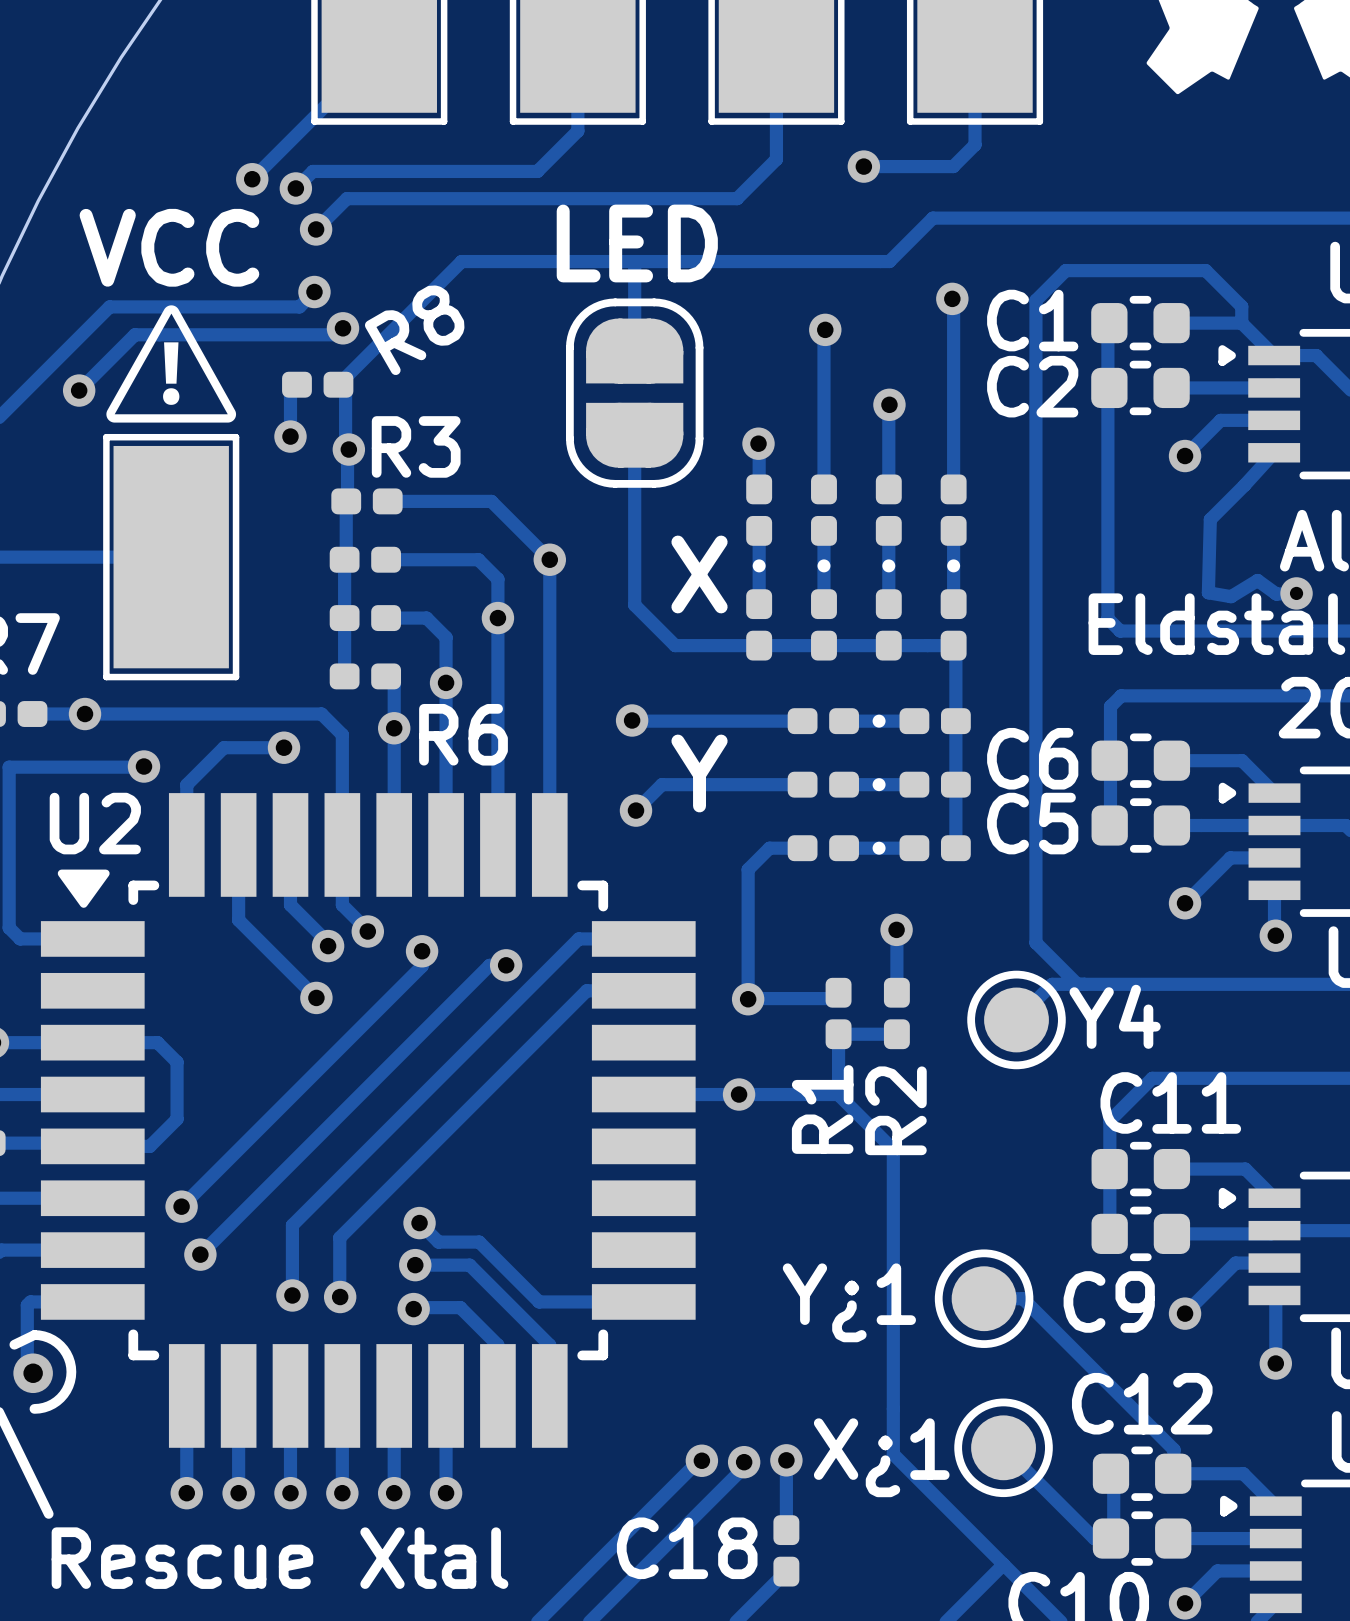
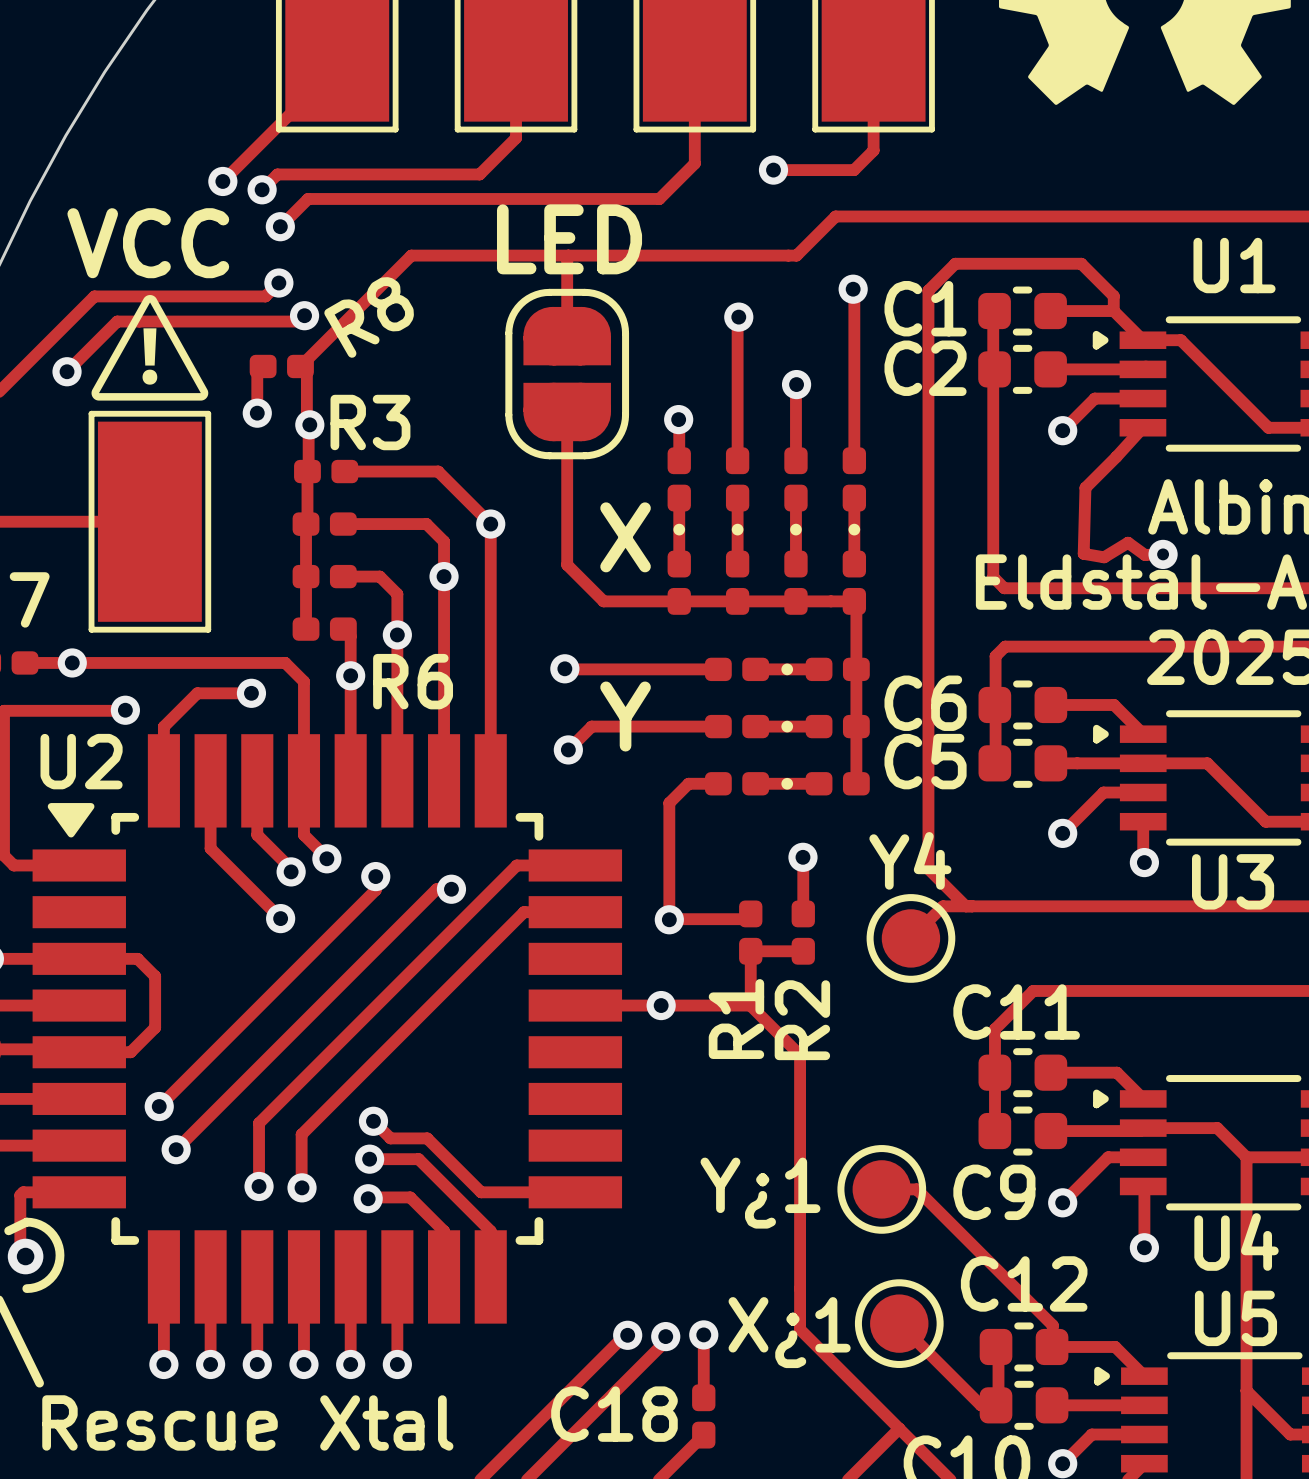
Y4 name position: Y4 (1115, 1016) -> Y4 (910, 860)
C11 name position: C11 (1170, 1102) -> C11 (1016, 1011)

